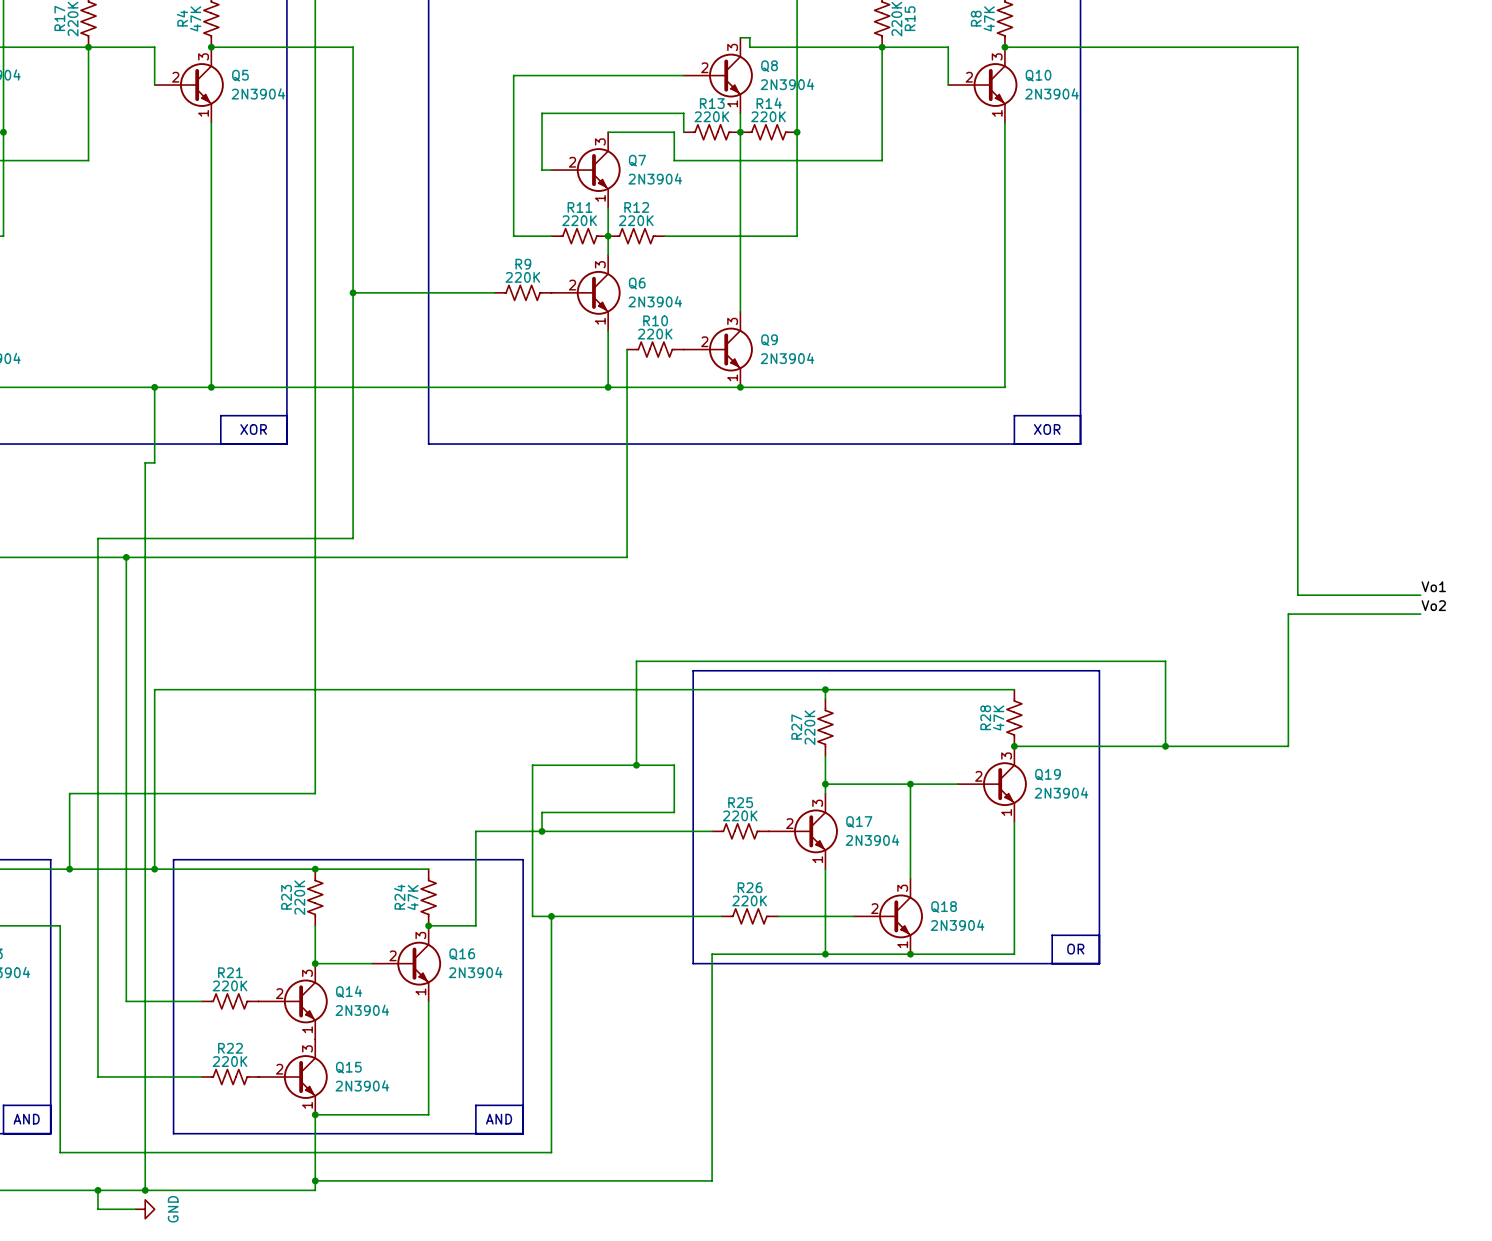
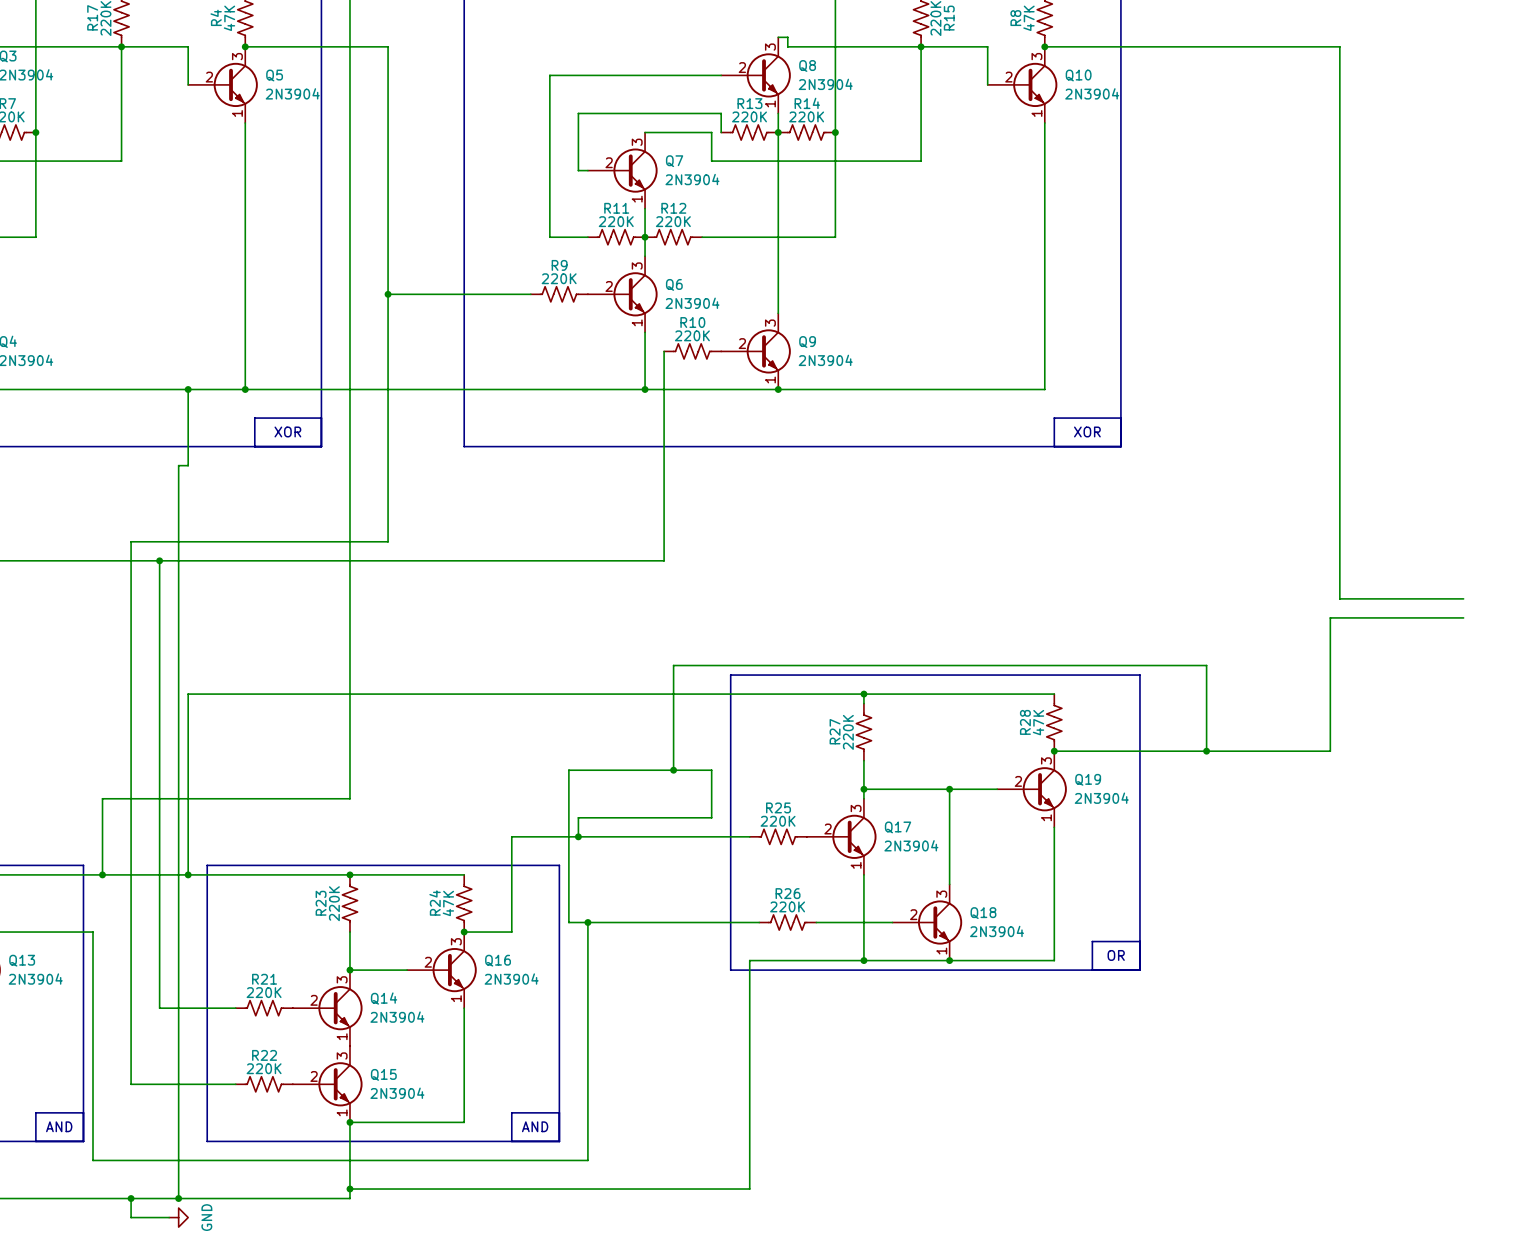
label: Vo1 (1433, 586) -> none
label: Vo2 (1433, 605) -> none

